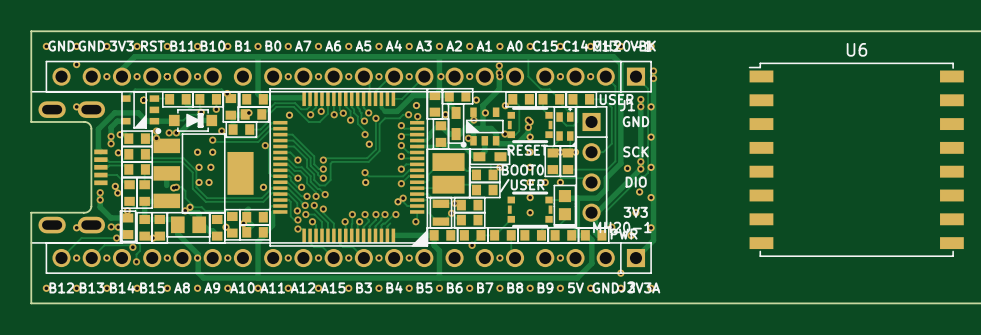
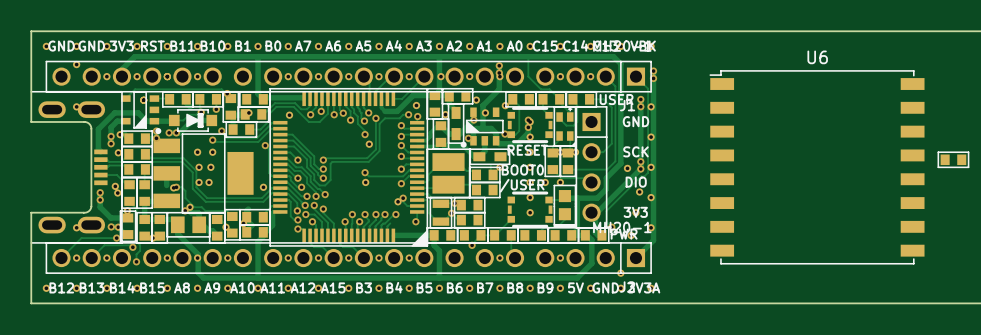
U6 position: (856, 159) -> (817, 167)
part: none -> (953, 159)

